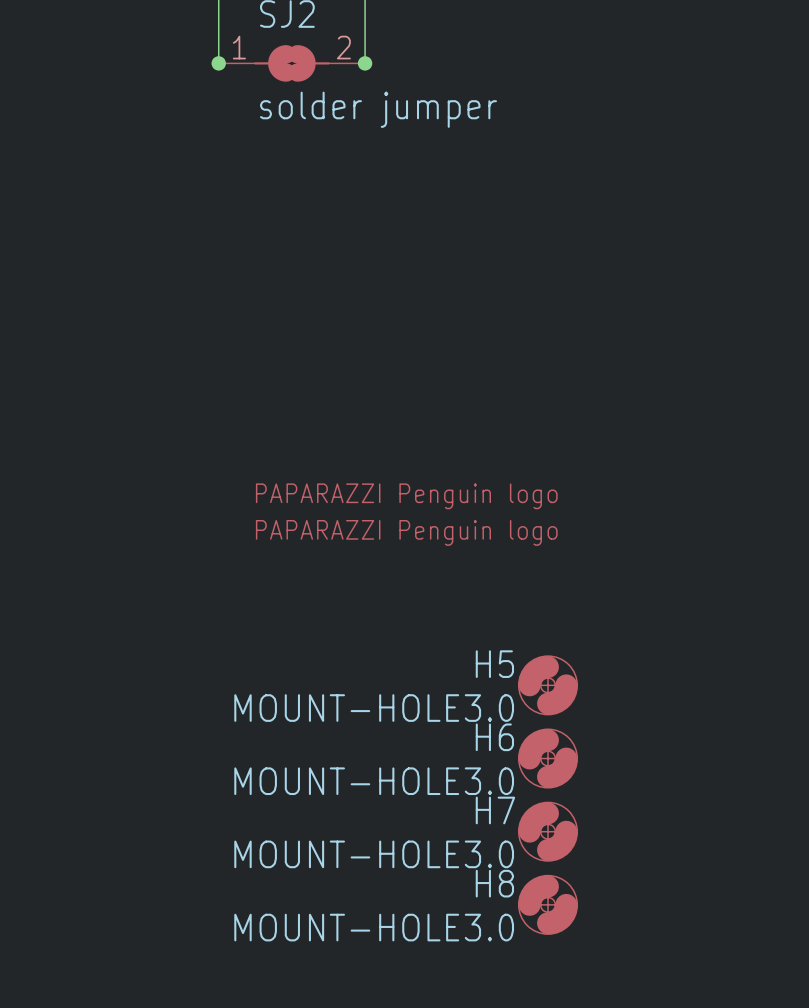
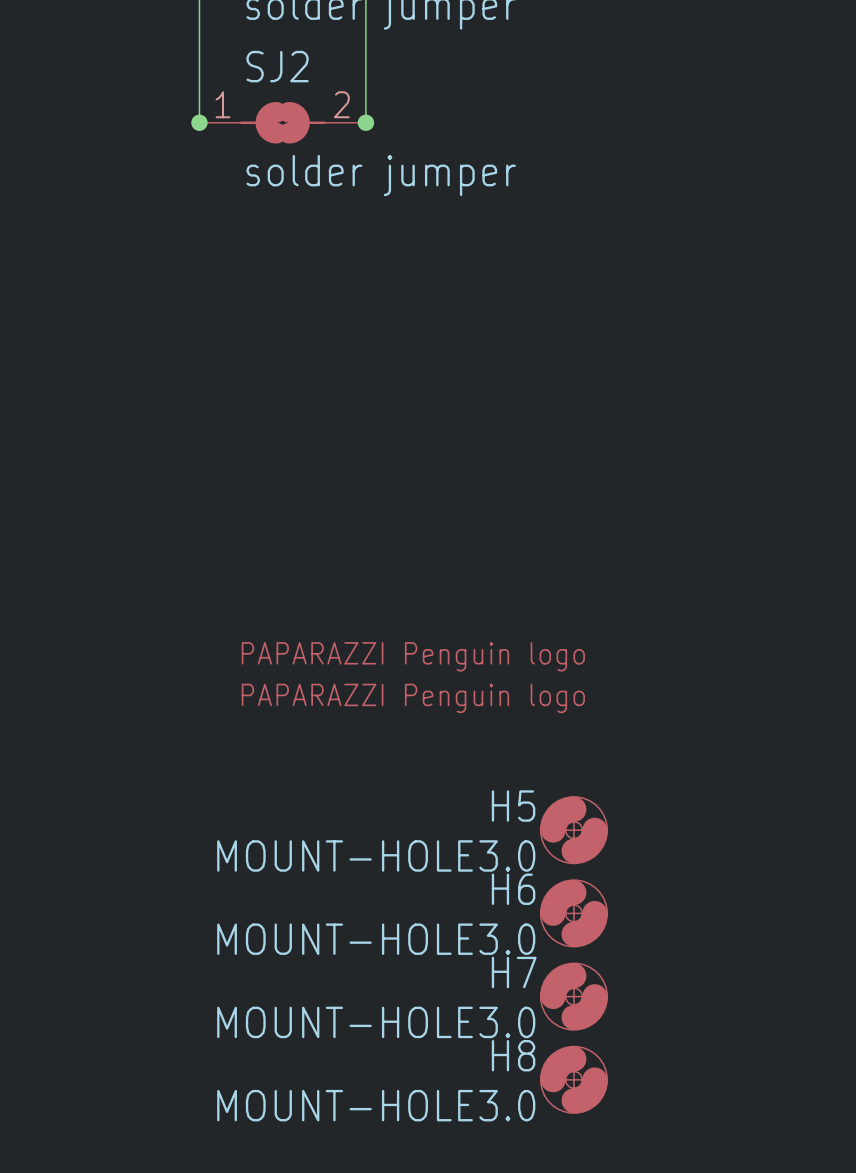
part position: (406, 496) -> (413, 698)

